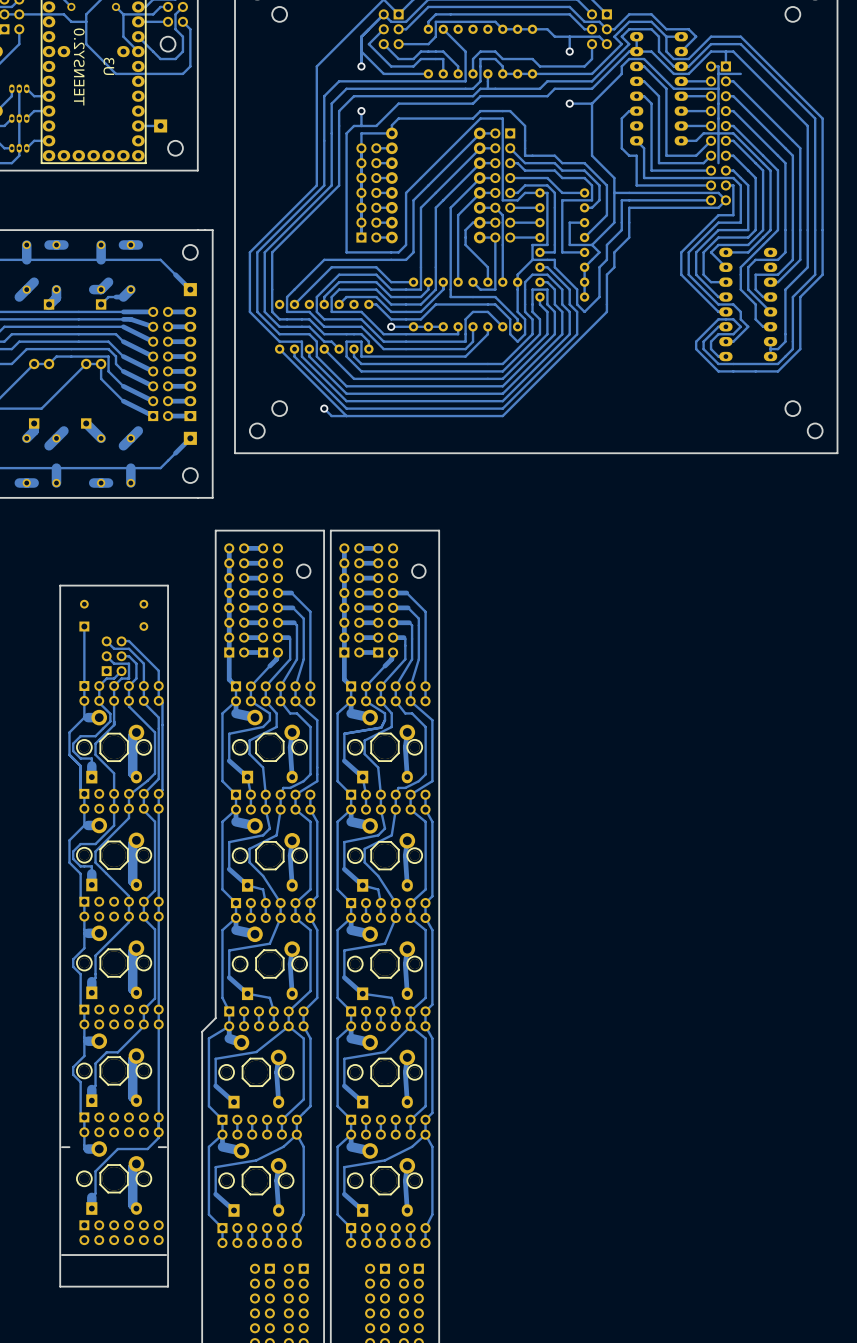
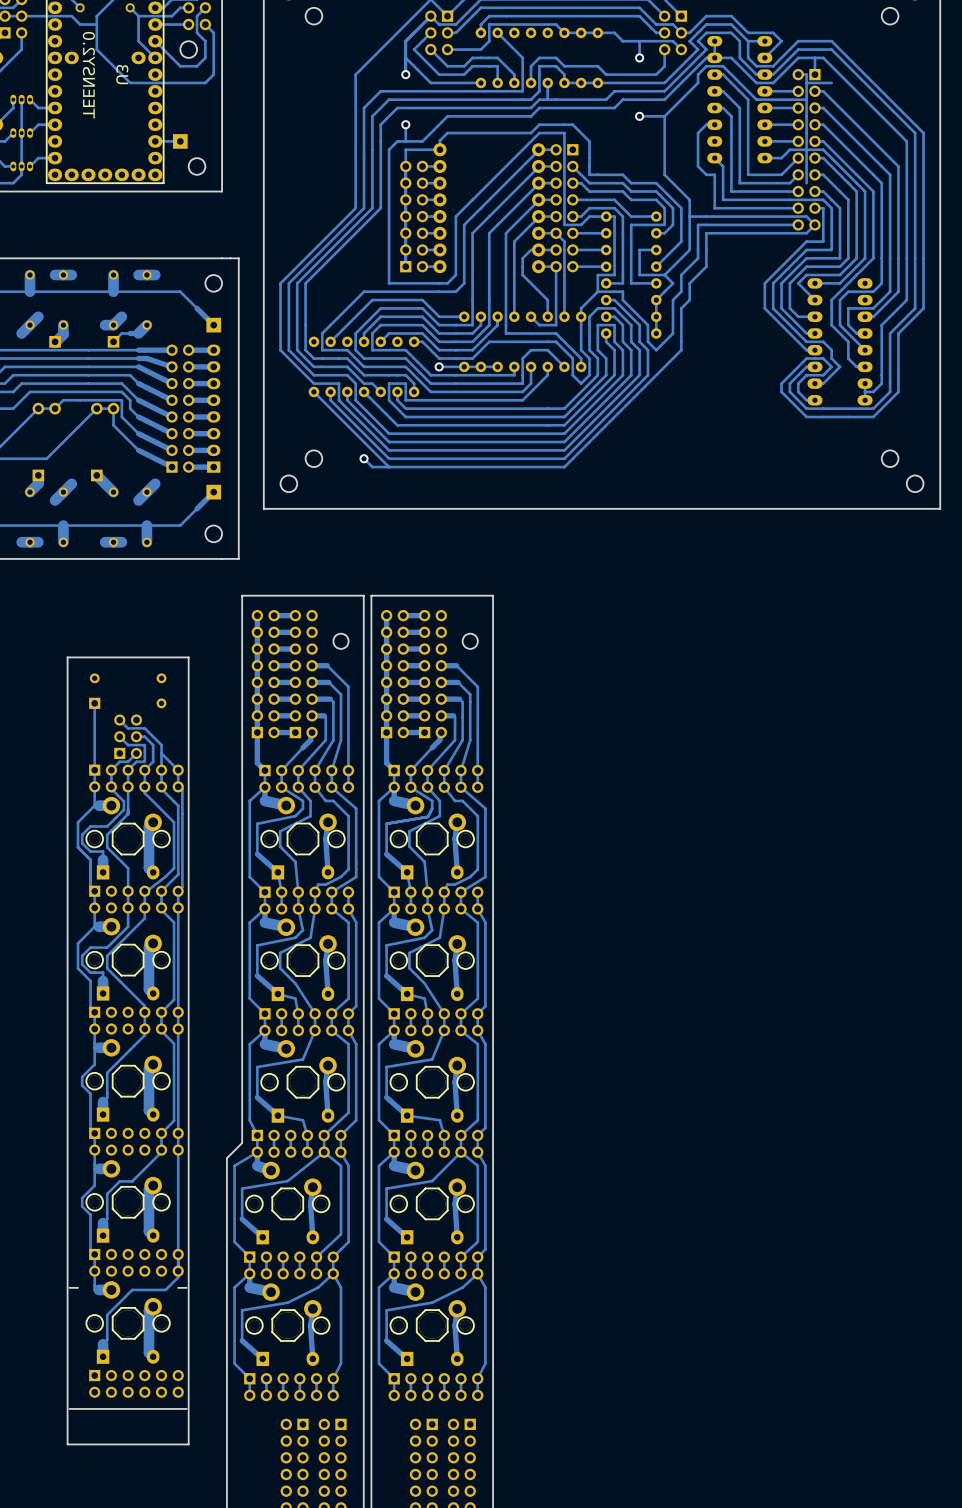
track: (121, 641) (129, 641) (158, 670) (158, 685) -> none
track: none -> (161, 753) (178, 770)

